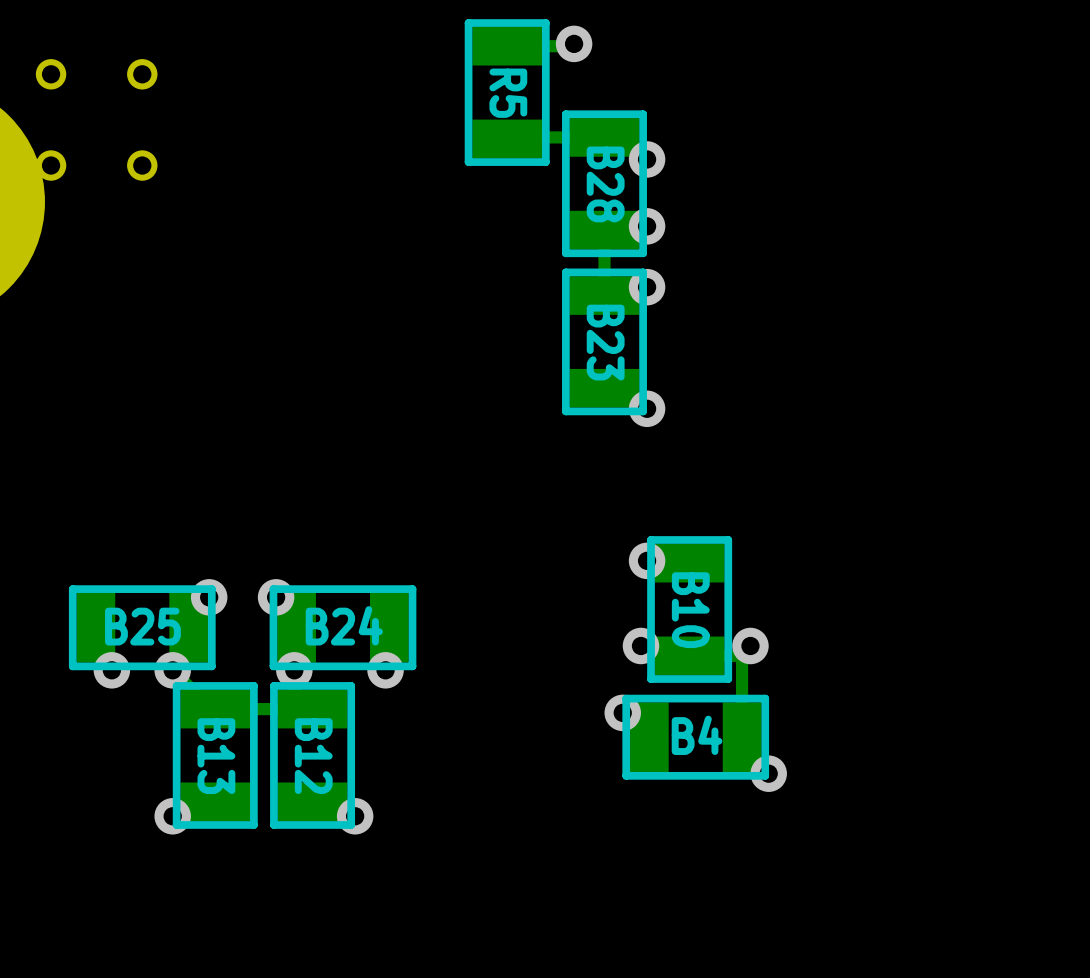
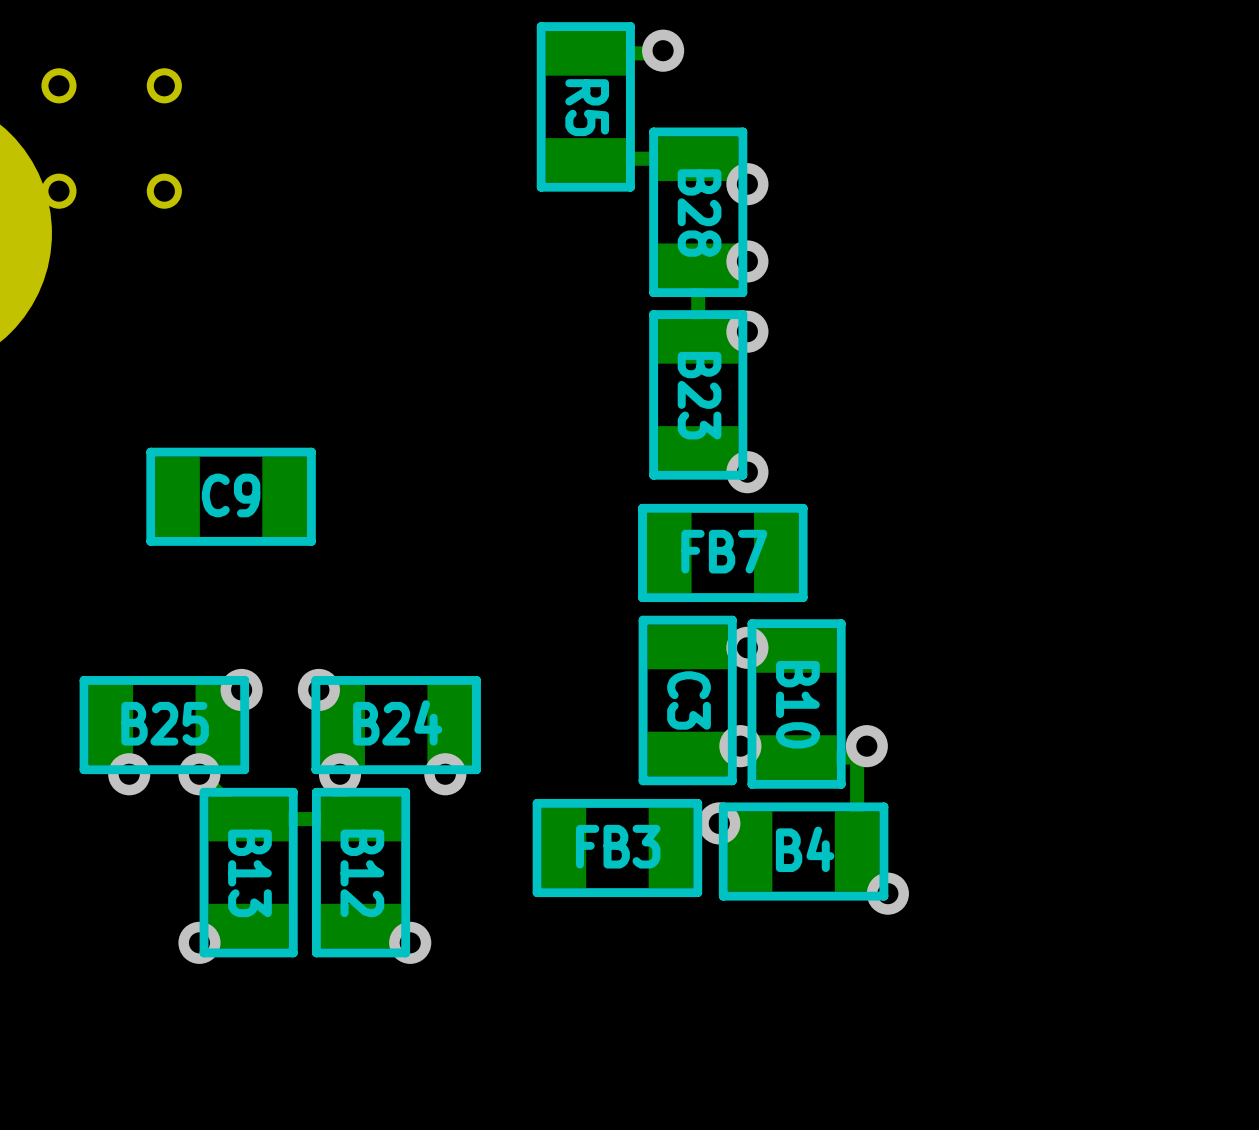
C9: none -> (231, 496)
FB7: none -> (722, 552)
C3: none -> (687, 700)
FB3: none -> (617, 848)

